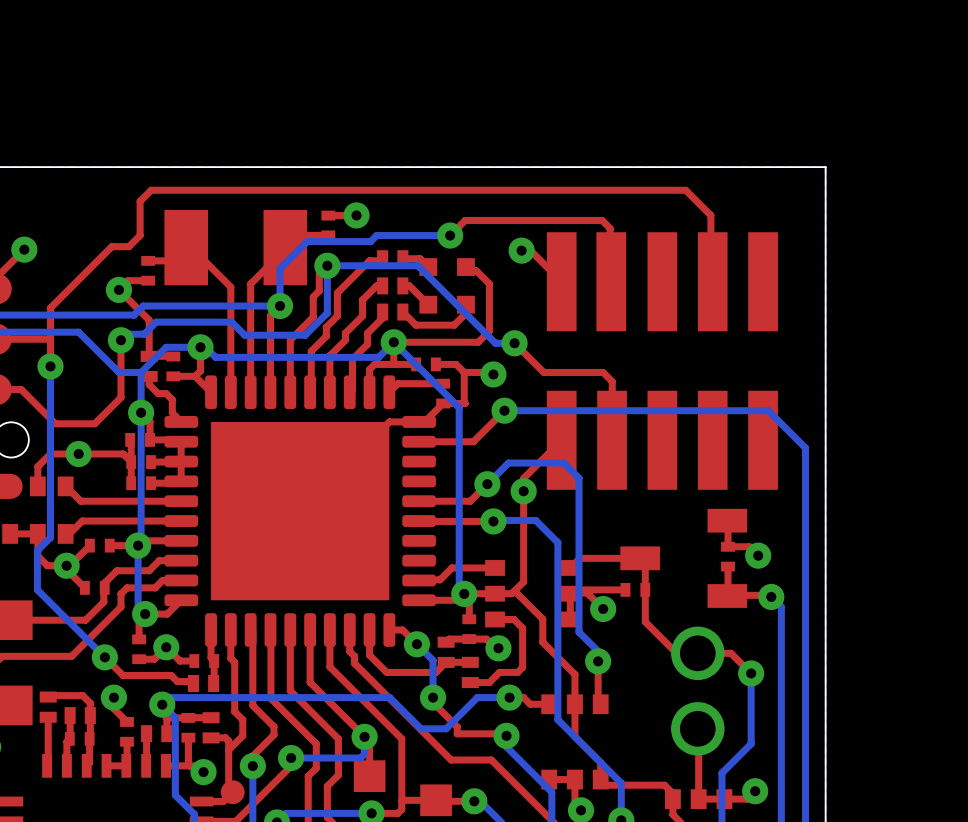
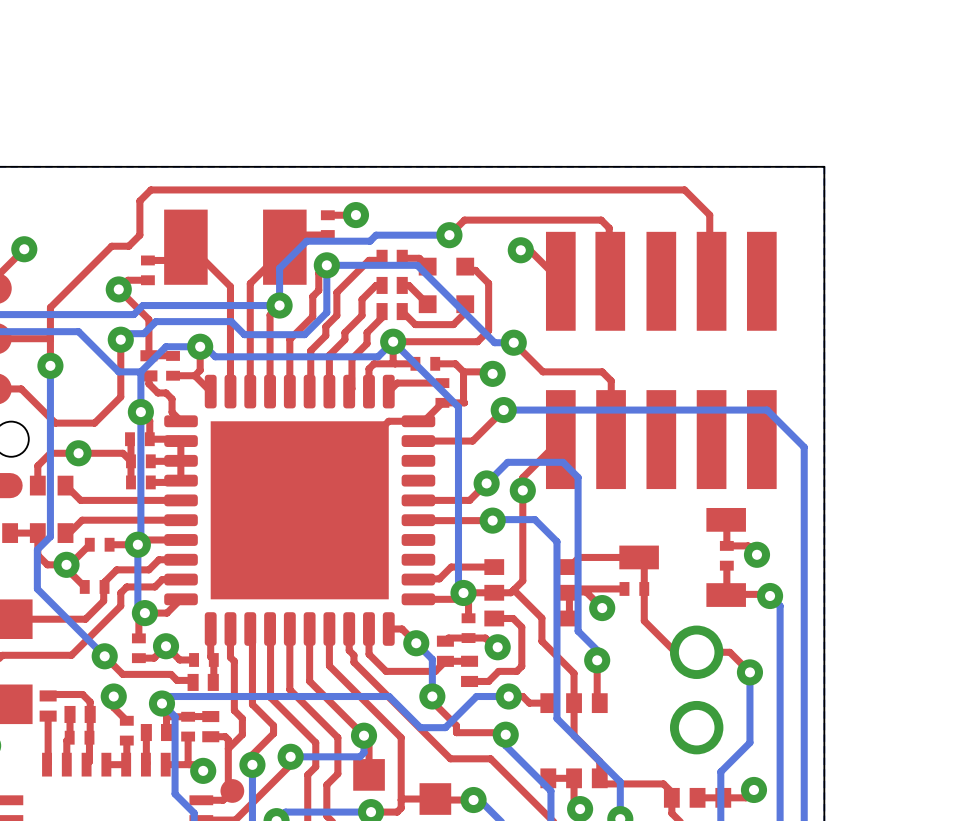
top track: (697, 728) (698, 799) -> none

